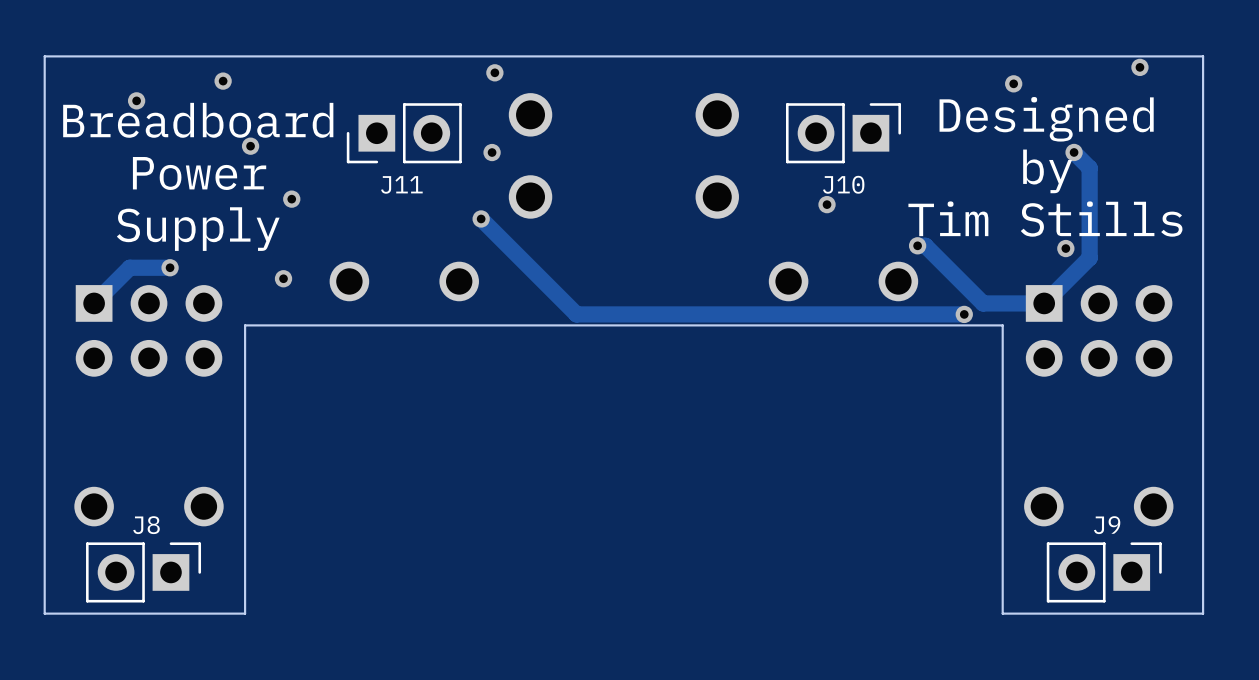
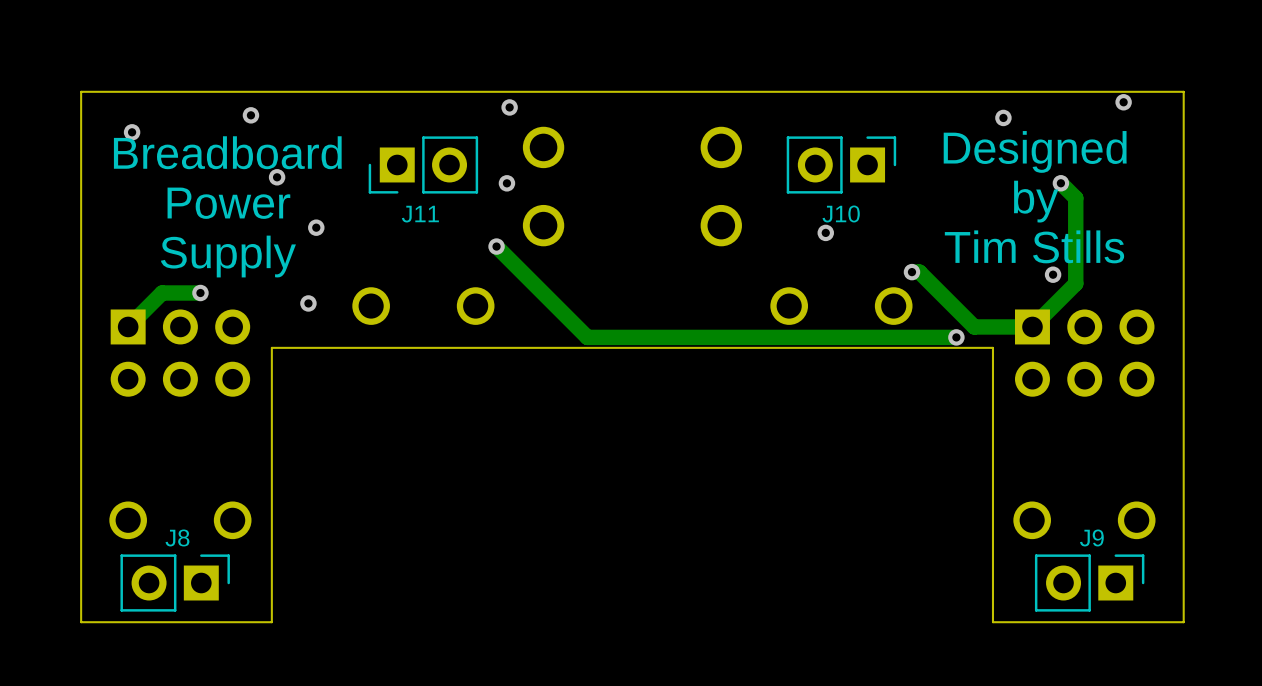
via position: (136, 100) -> (132, 132)

